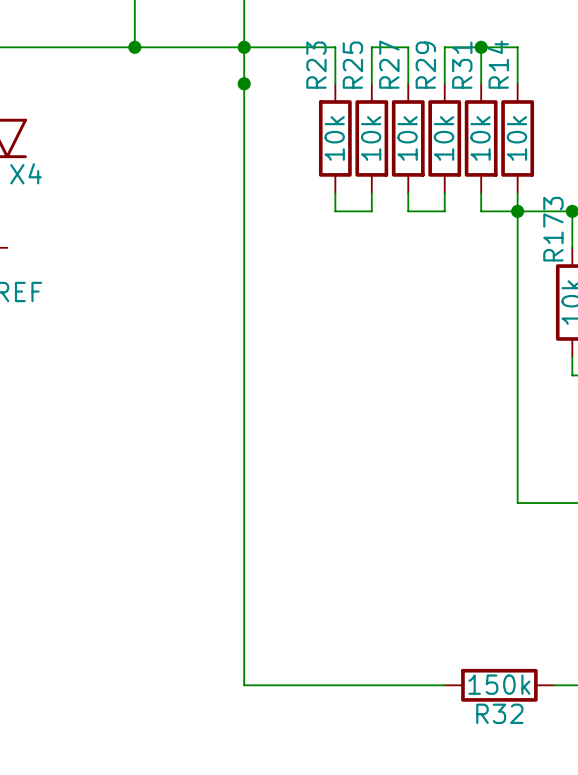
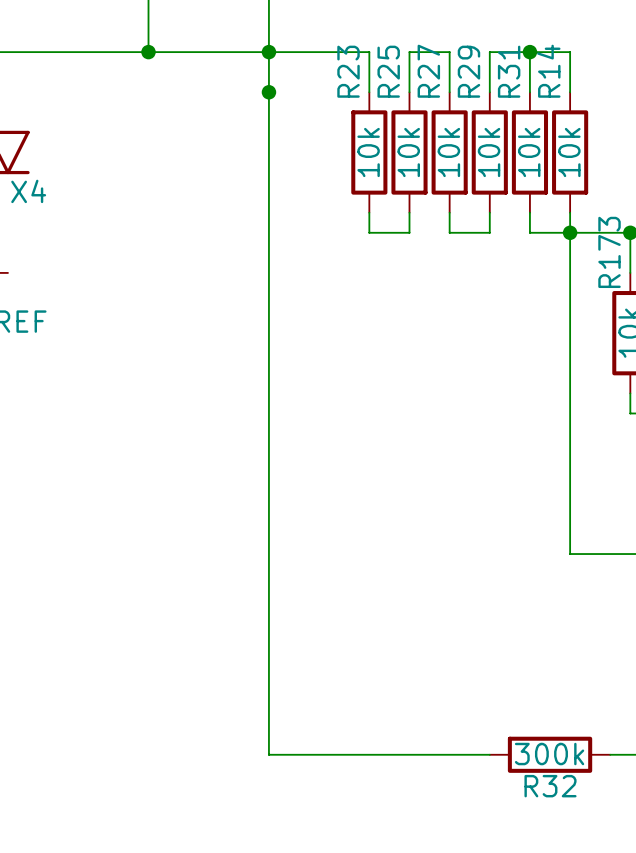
R32 value: 150k (499, 684) -> 300k (549, 754)

